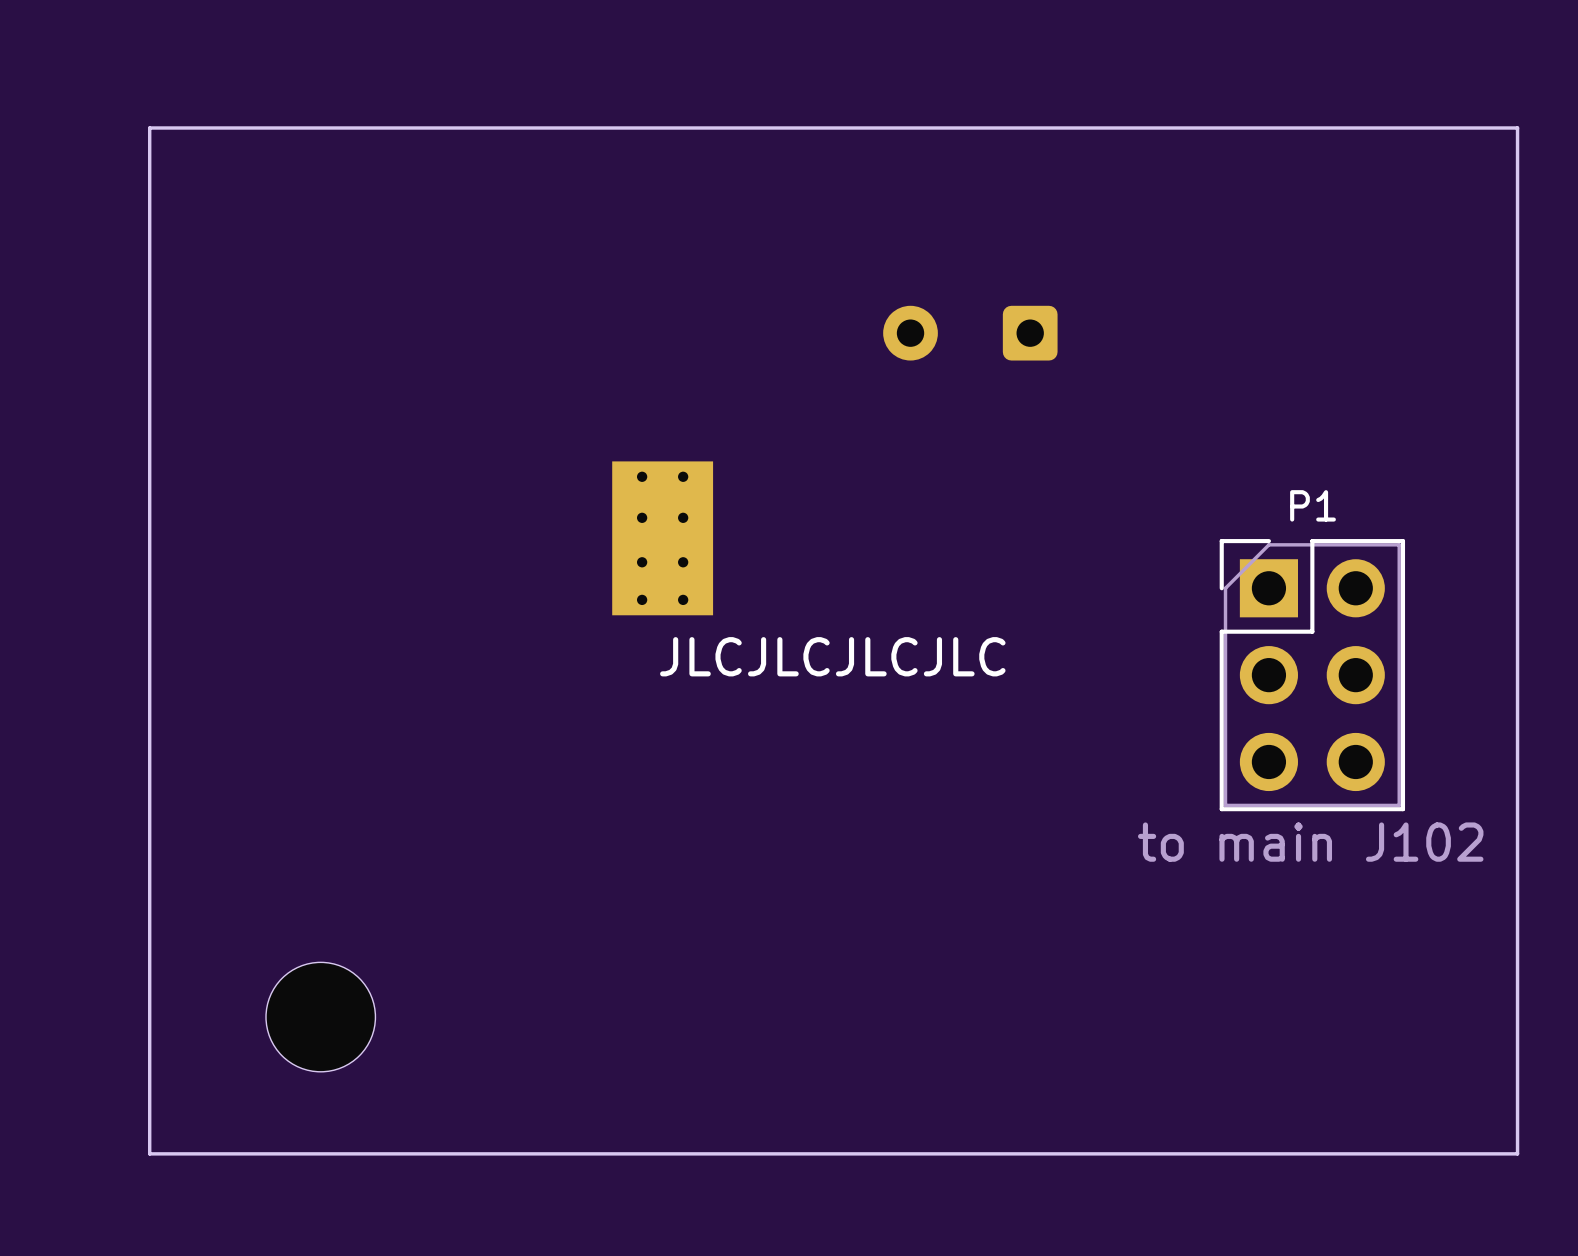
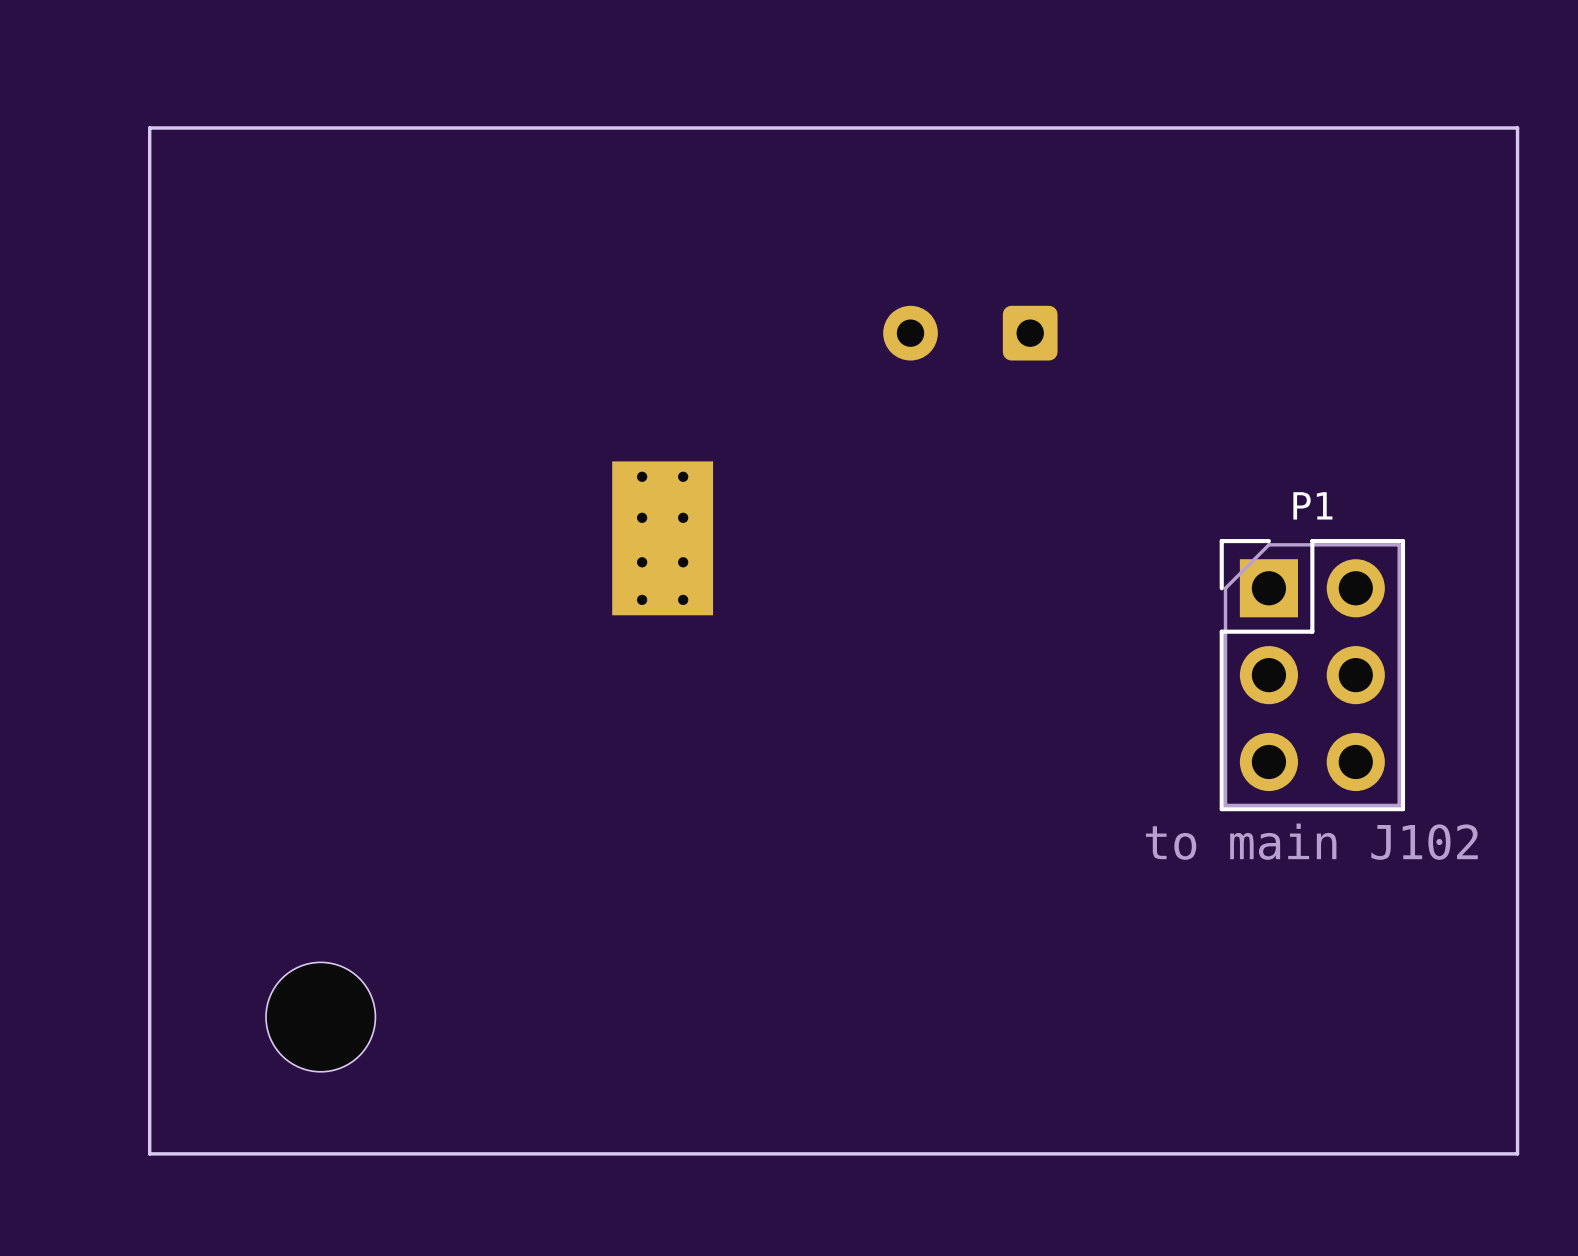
text: JLCJLCJLCJLC (832, 656) -> none

